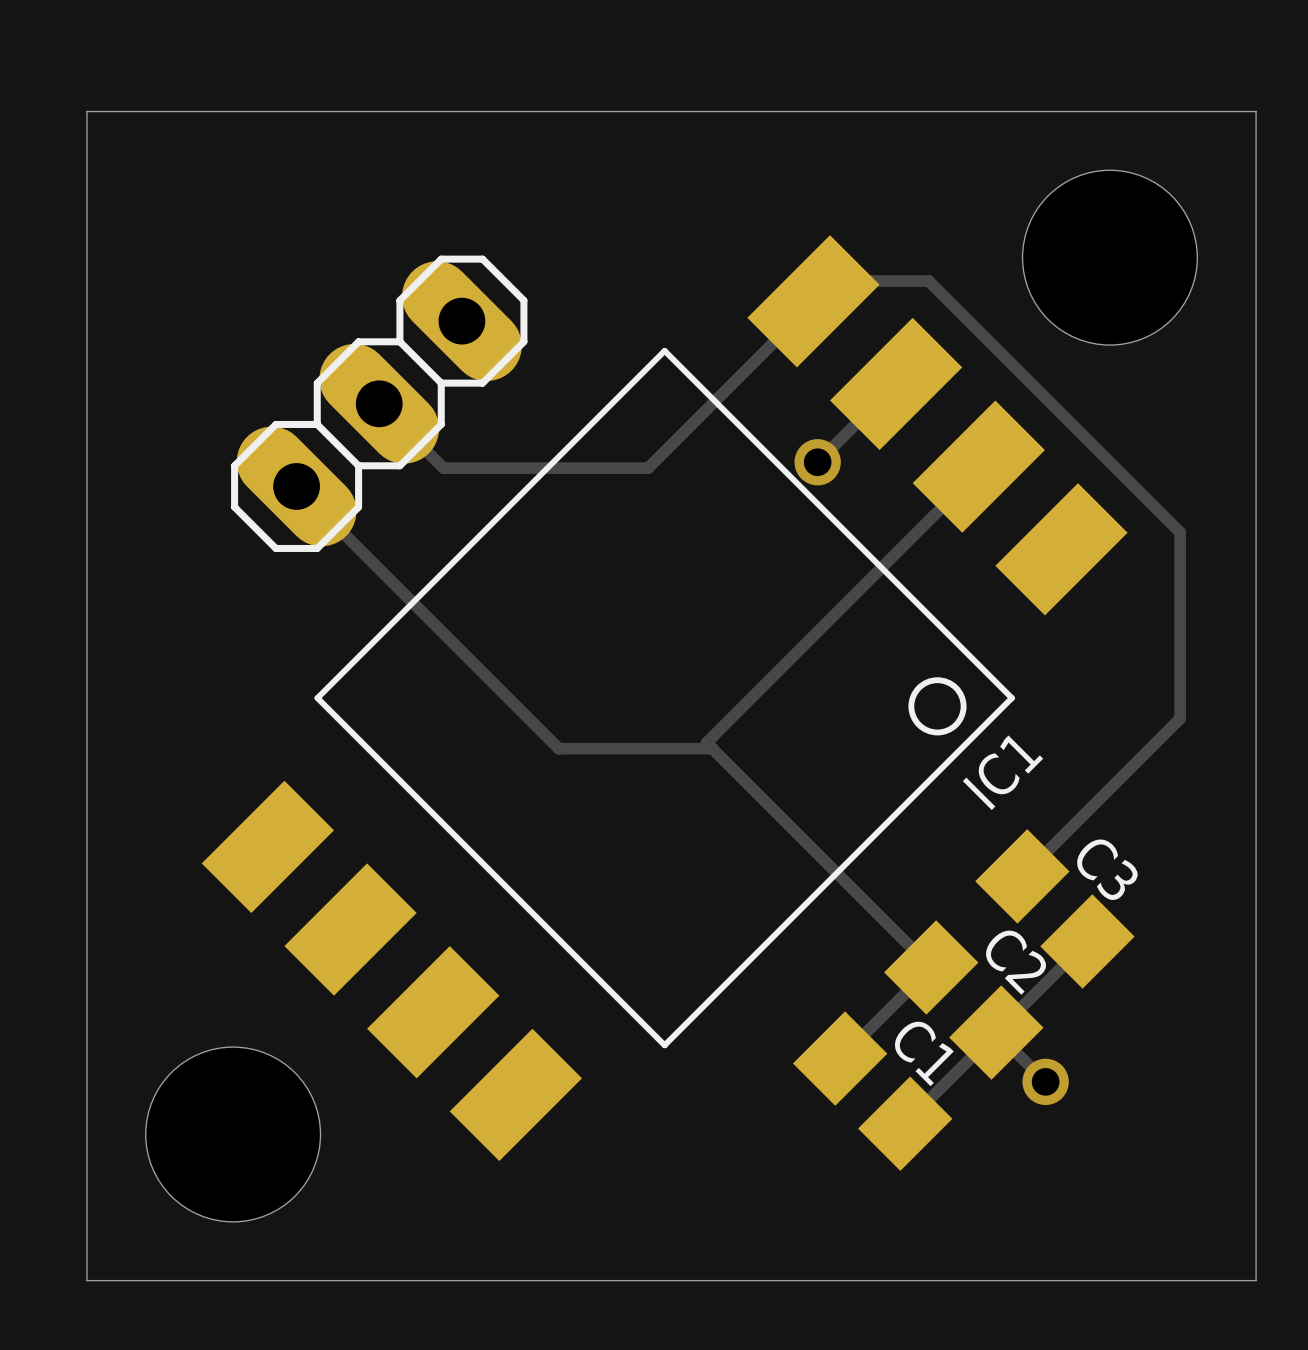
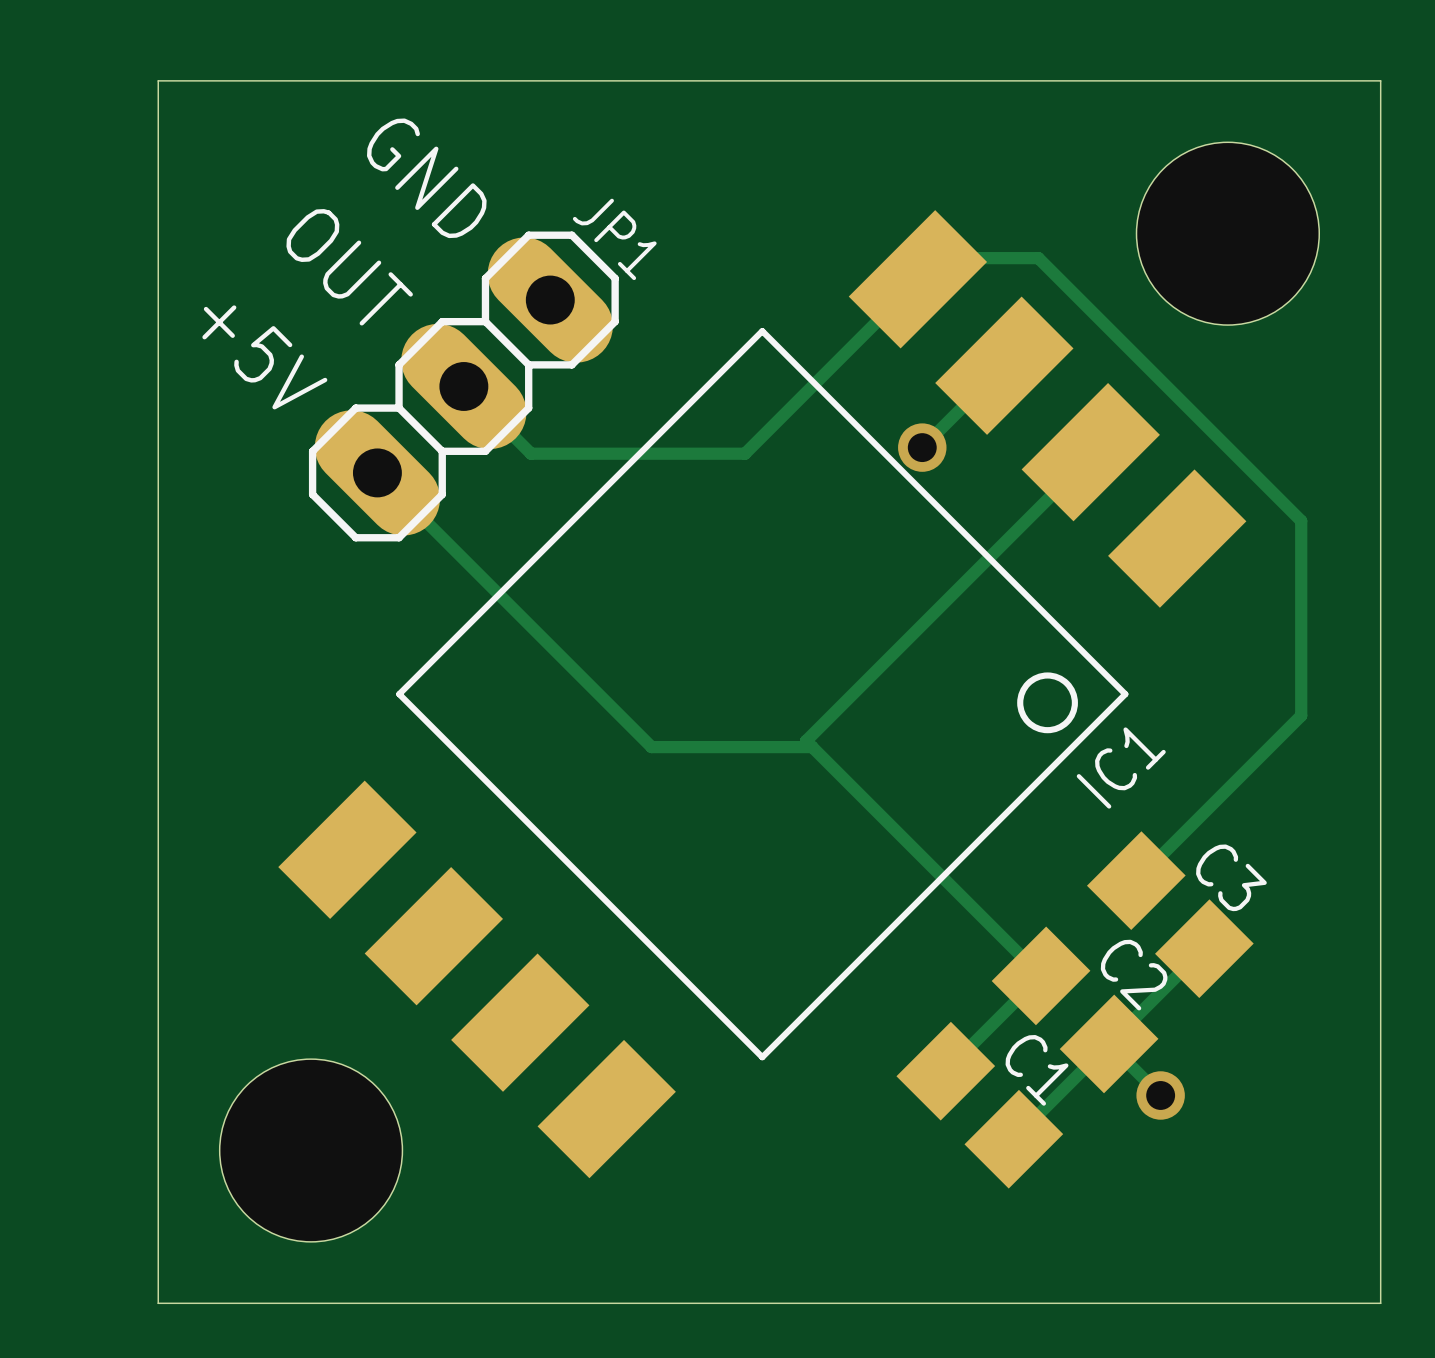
text: none -> GND (426, 178)
JP1 name: none -> JP1 (614, 239)
text: none -> OUT (349, 267)
text: none -> +5V (264, 357)

